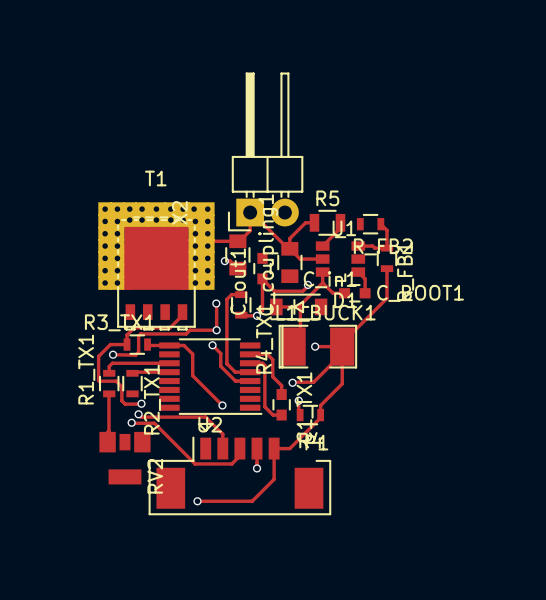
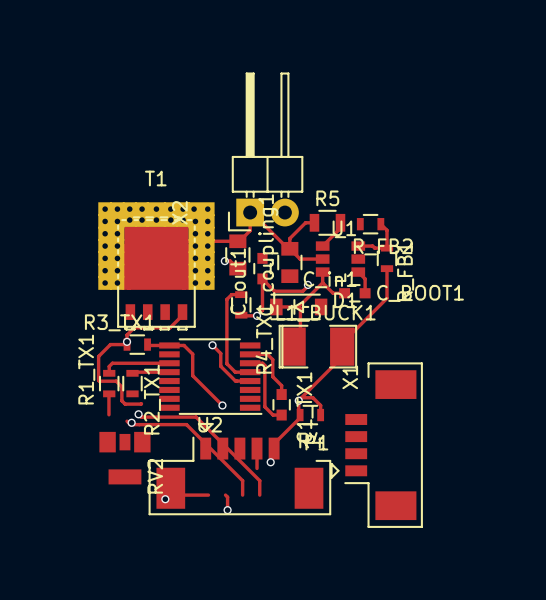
track: (216, 303) (216, 330) (189, 330) (186, 333) (140, 333) (138, 335) (138, 352) (135, 355) (113, 355) -> none
via: (216, 303) -> none
via: (216, 330) -> none
track: (315, 346) (342, 346) (342, 383) (320, 405) -> (349, 350) (301, 397) (312, 397) (320, 405)
via: (315, 346) -> none
track: (342, 353) (313, 382) (292, 382) -> none
via position: (113, 354) -> (127, 341)
via: (292, 382) -> none
via: (141, 403) -> none
track: (108, 414) (107, 442) -> none
track: (320, 415) (320, 417) (289, 448) (274, 448) (274, 479) (252, 501) (197, 501) -> none
track: (196, 417) (205, 417) (222, 434) (222, 448) -> (196, 417) (259, 480) (259, 495)
track: none -> (300, 417) (270, 447) (270, 462)
track: none -> (127, 421) (130, 424) (186, 424) (242, 480) (242, 495)
track: (132, 423) (154, 423) (195, 463) (231, 463) (239, 455) (239, 448) -> none
X1: none -> (376, 445)
via position: (257, 468) -> (270, 462)
track: none -> (208, 495) (169, 495) (165, 499)
track: none -> (225, 495) (227, 497) (227, 510)
via: none -> (165, 499)
via: (197, 501) -> none
via: none -> (227, 510)

